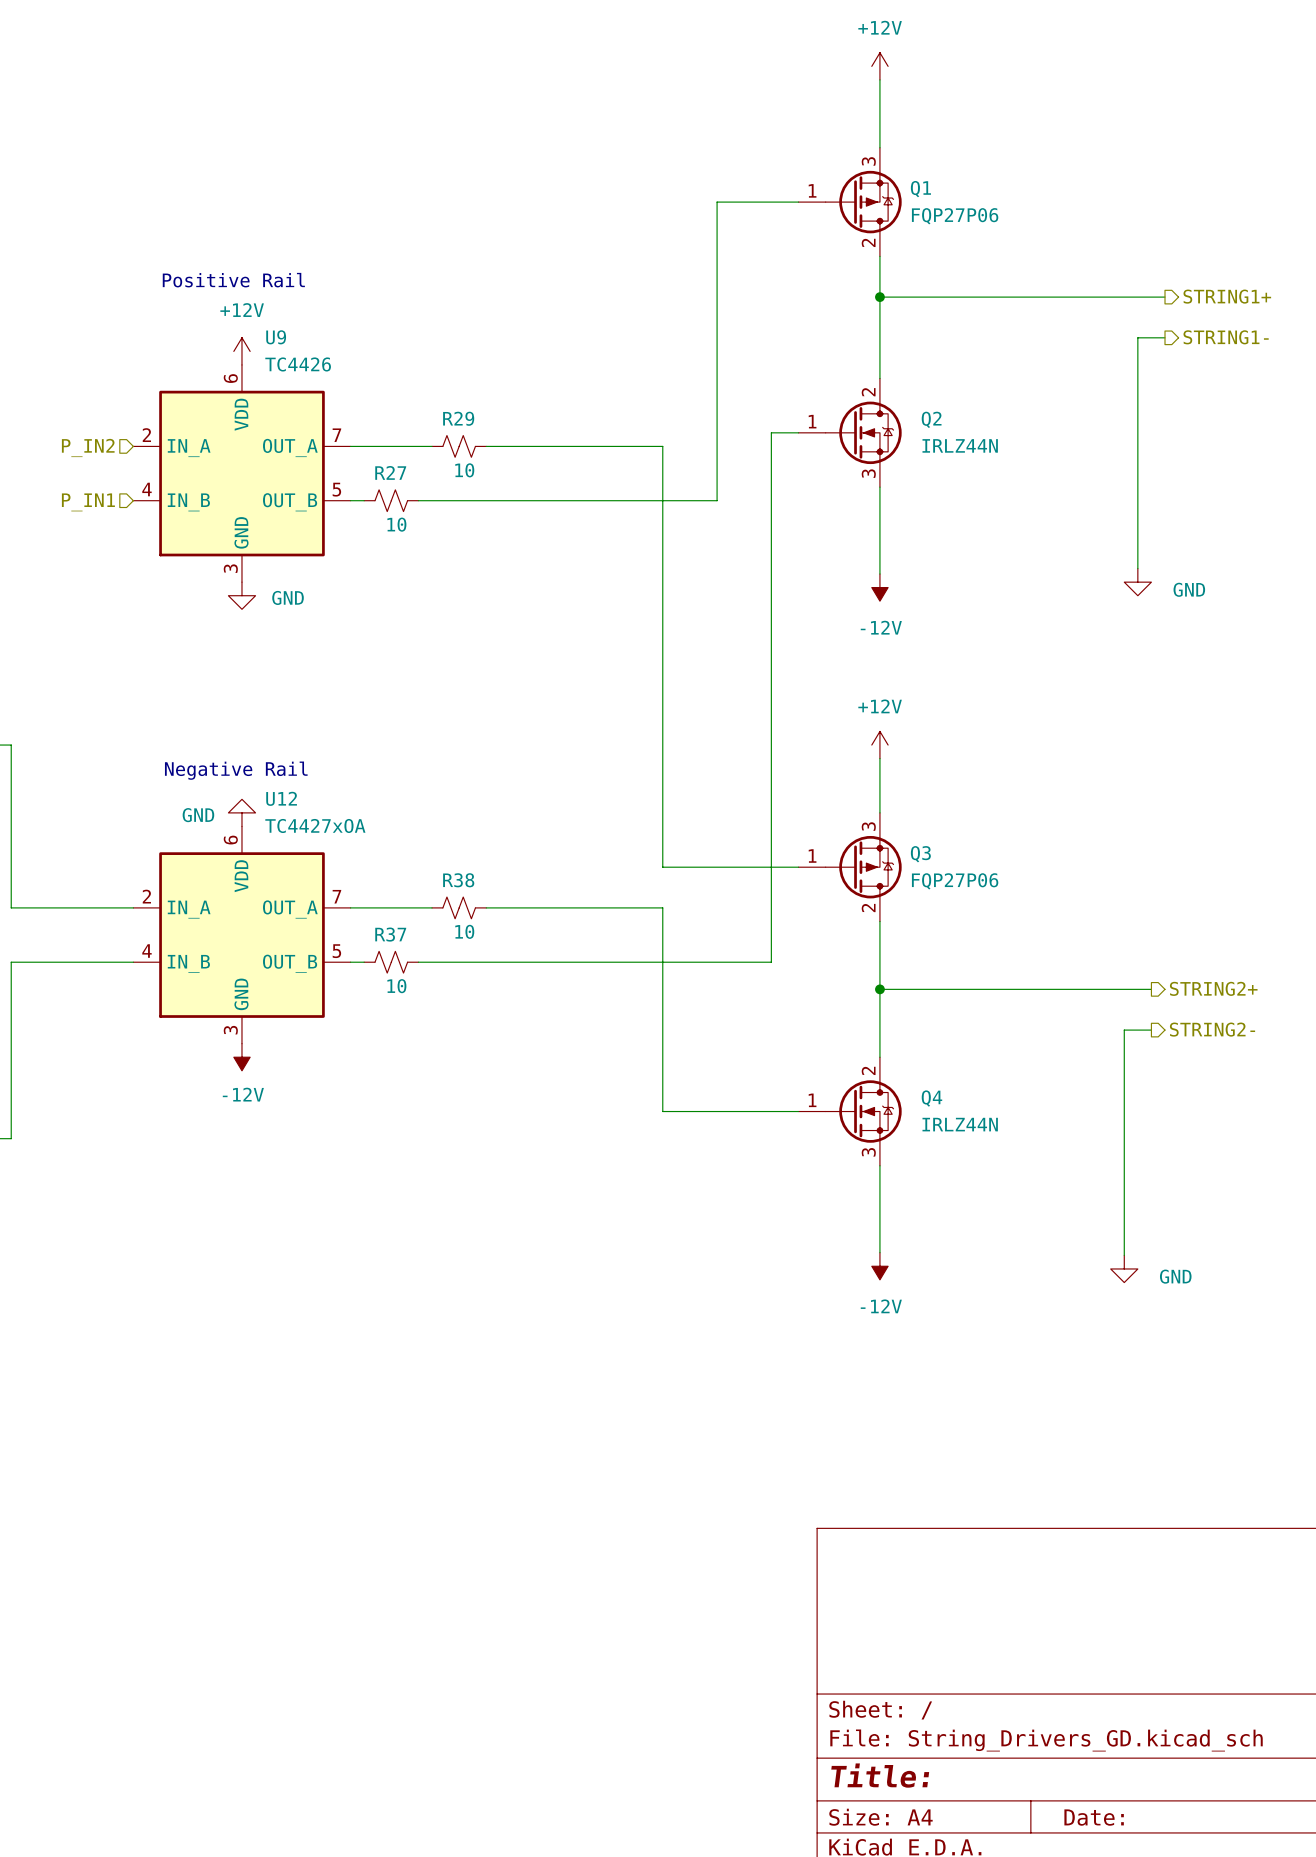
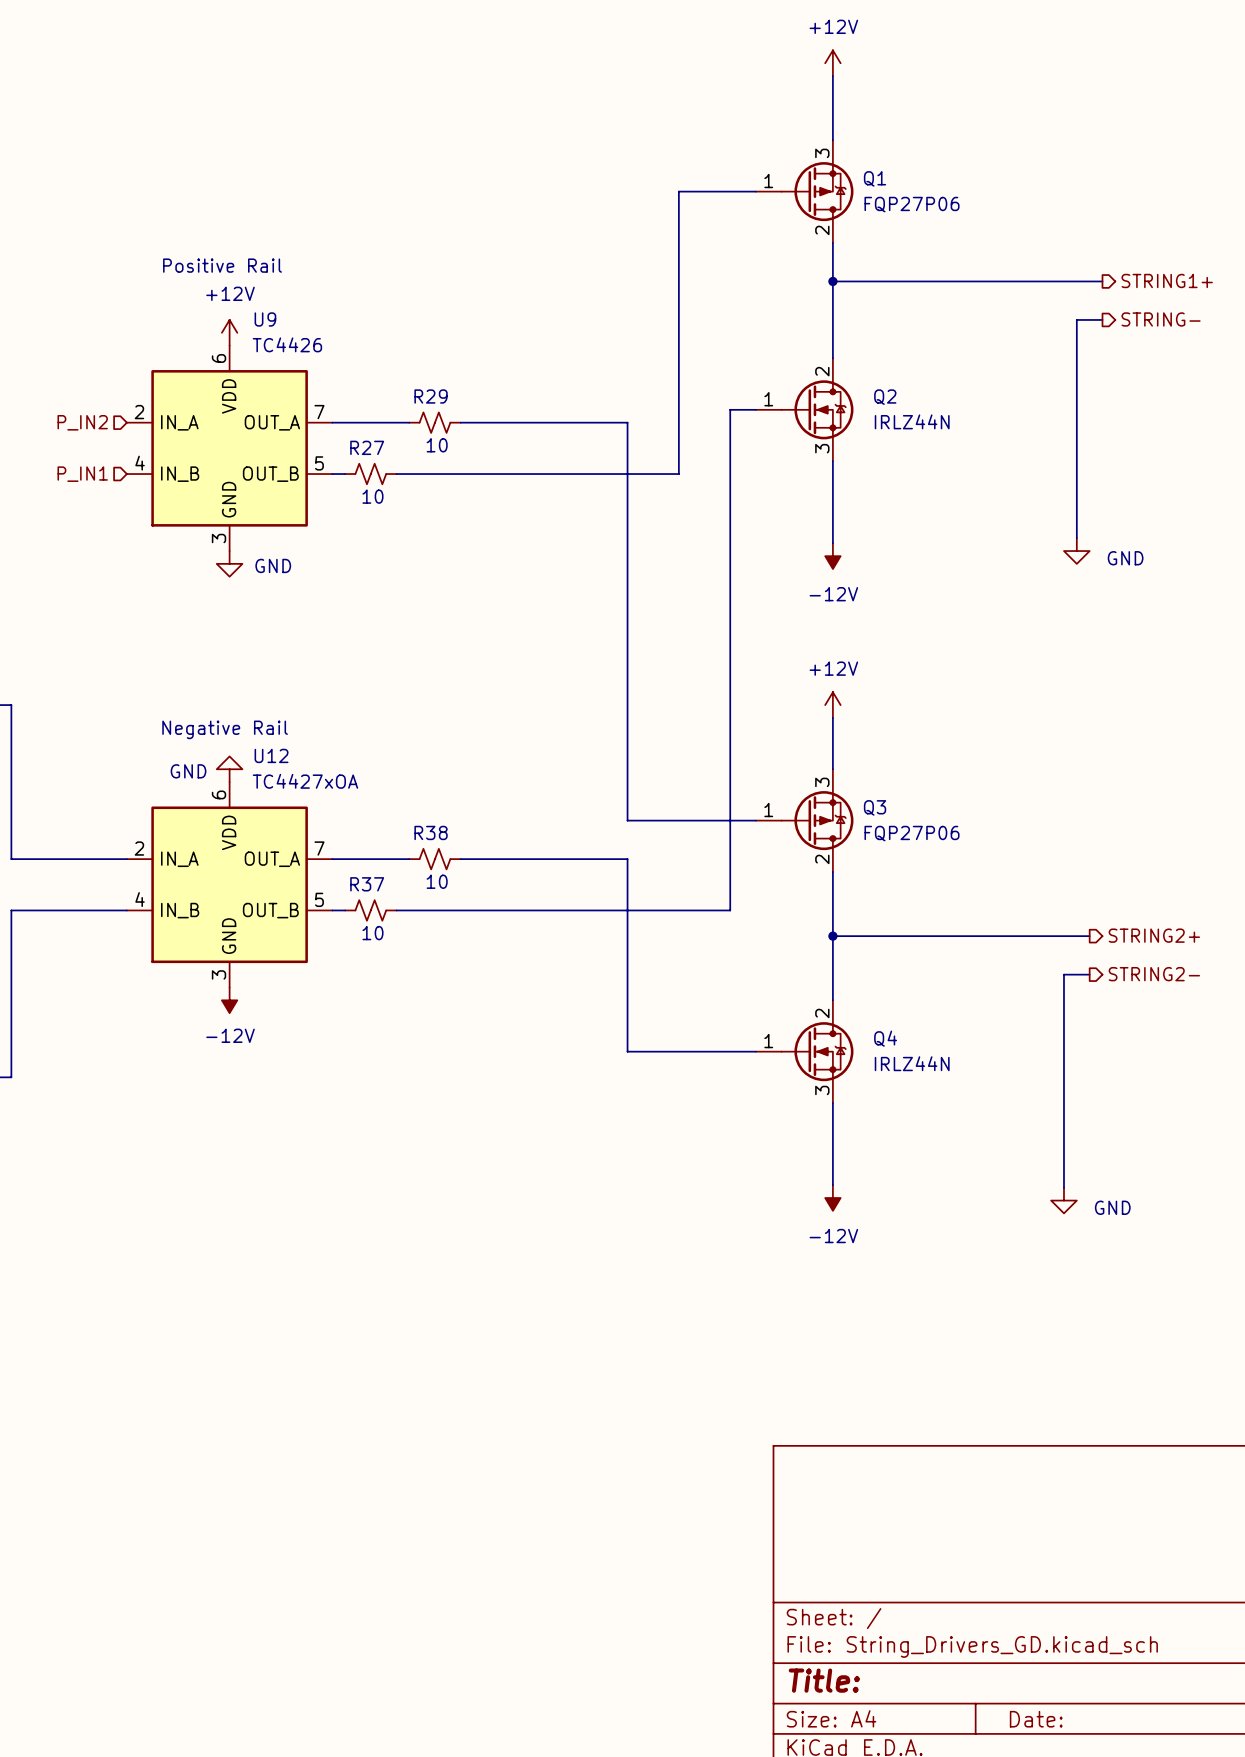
hierarchical label: STRING1- (1226, 337) -> STRING- (1161, 319)

